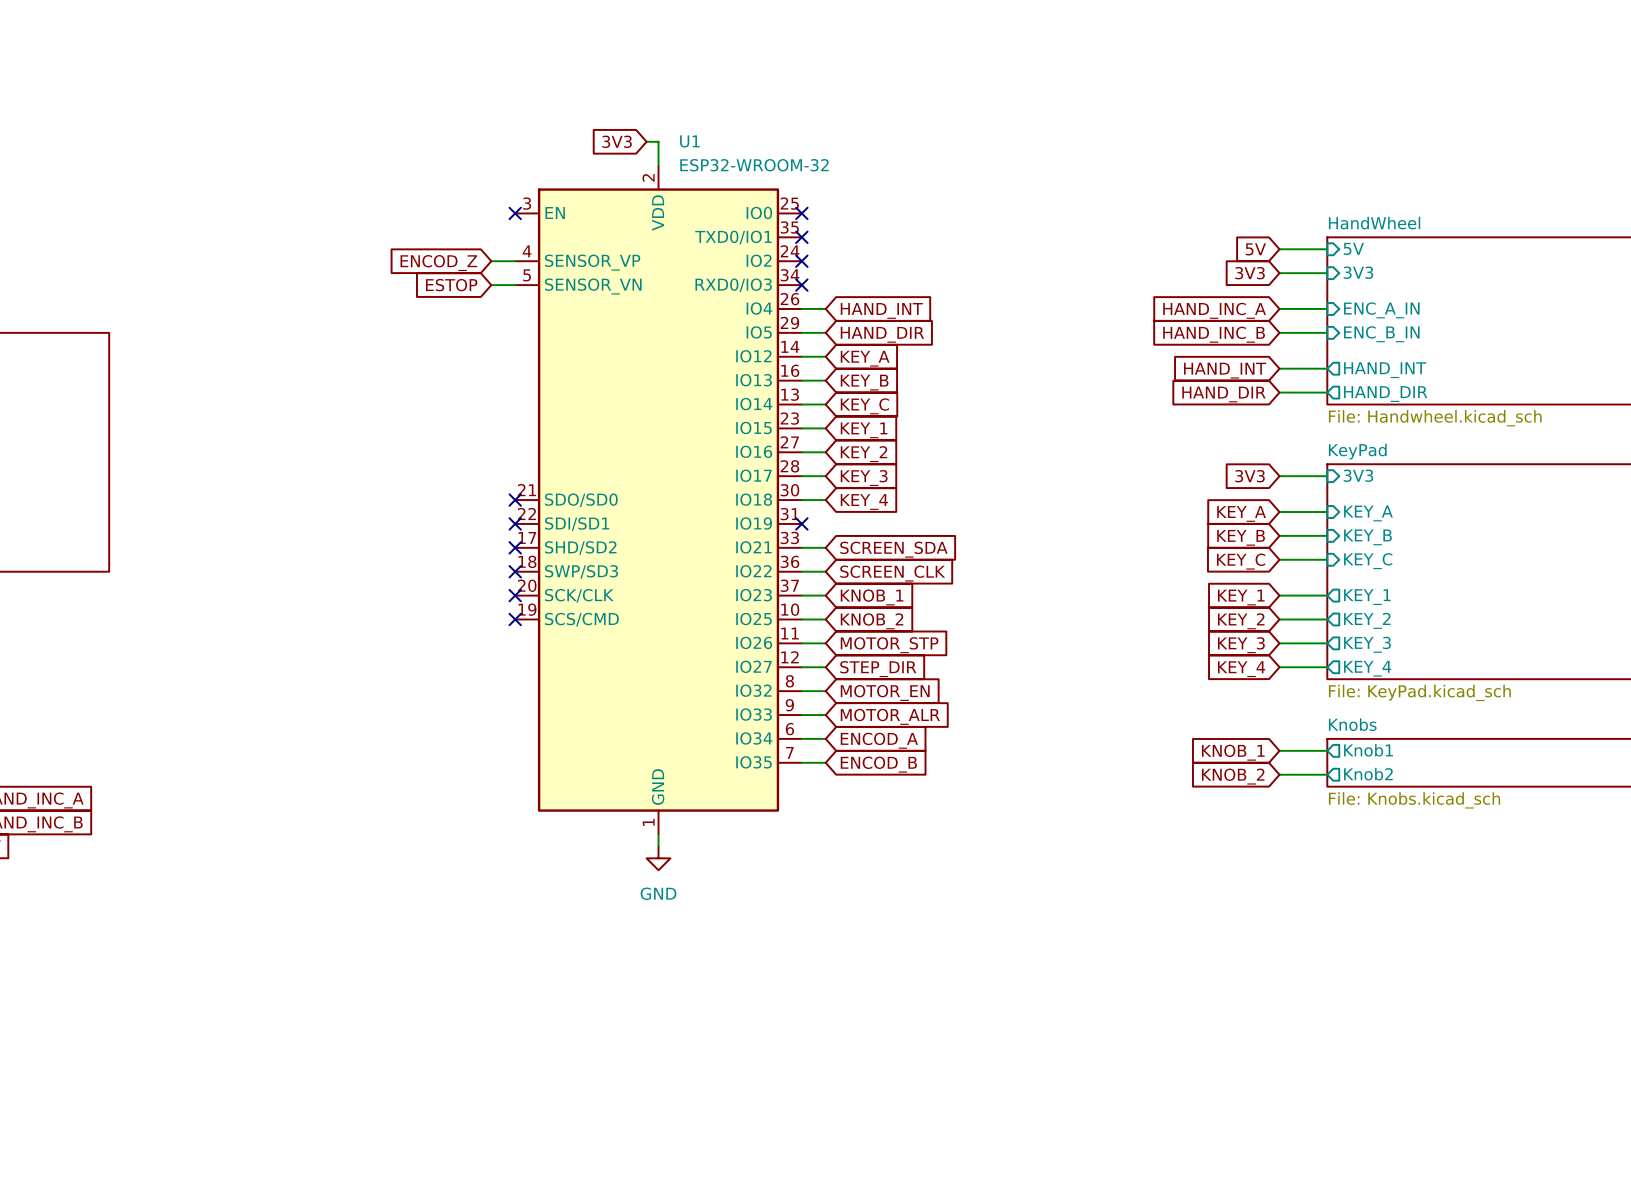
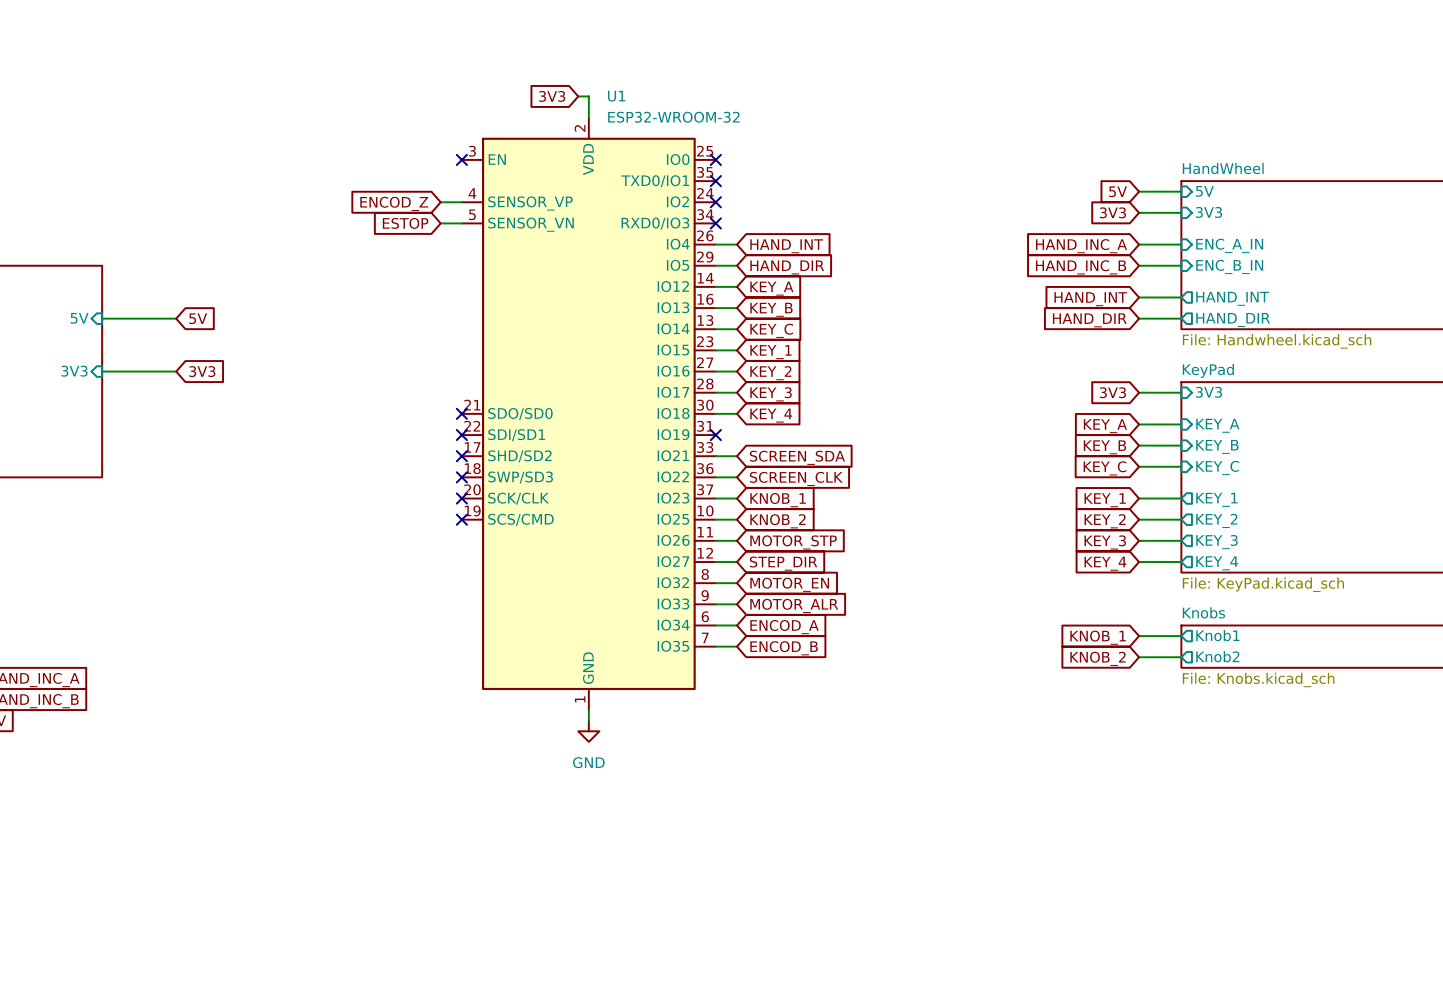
sheet pin: none -> 5V (79, 318)
wire: none -> (102, 318) (176, 318)
global label: none -> 5V (198, 318)
sheet pin: none -> 3V3 (74, 371)
wire: none -> (102, 371) (176, 371)
global label: none -> 3V3 (202, 371)

